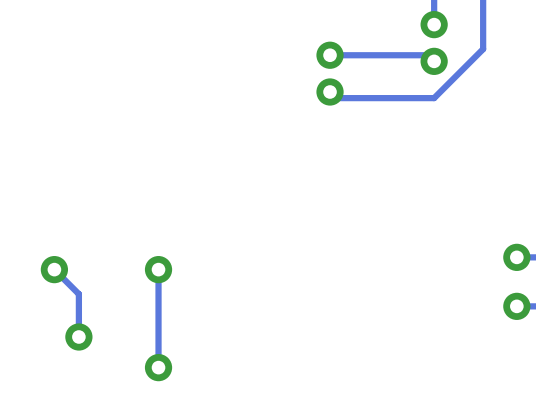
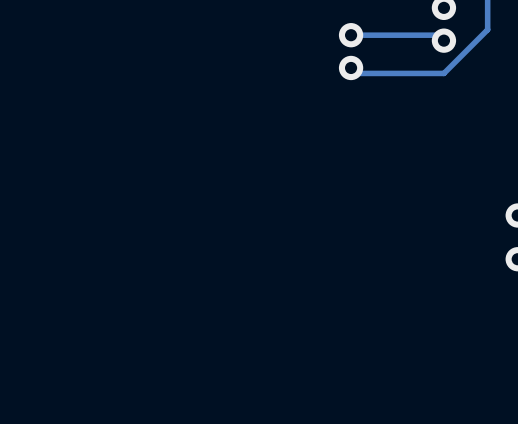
track: (54, 269) (78, 294) (78, 336) -> none
via: (54, 269) -> none
track: (158, 269) (158, 367) -> none
via: (158, 269) -> none
via: (78, 336) -> none
via: (158, 367) -> none

